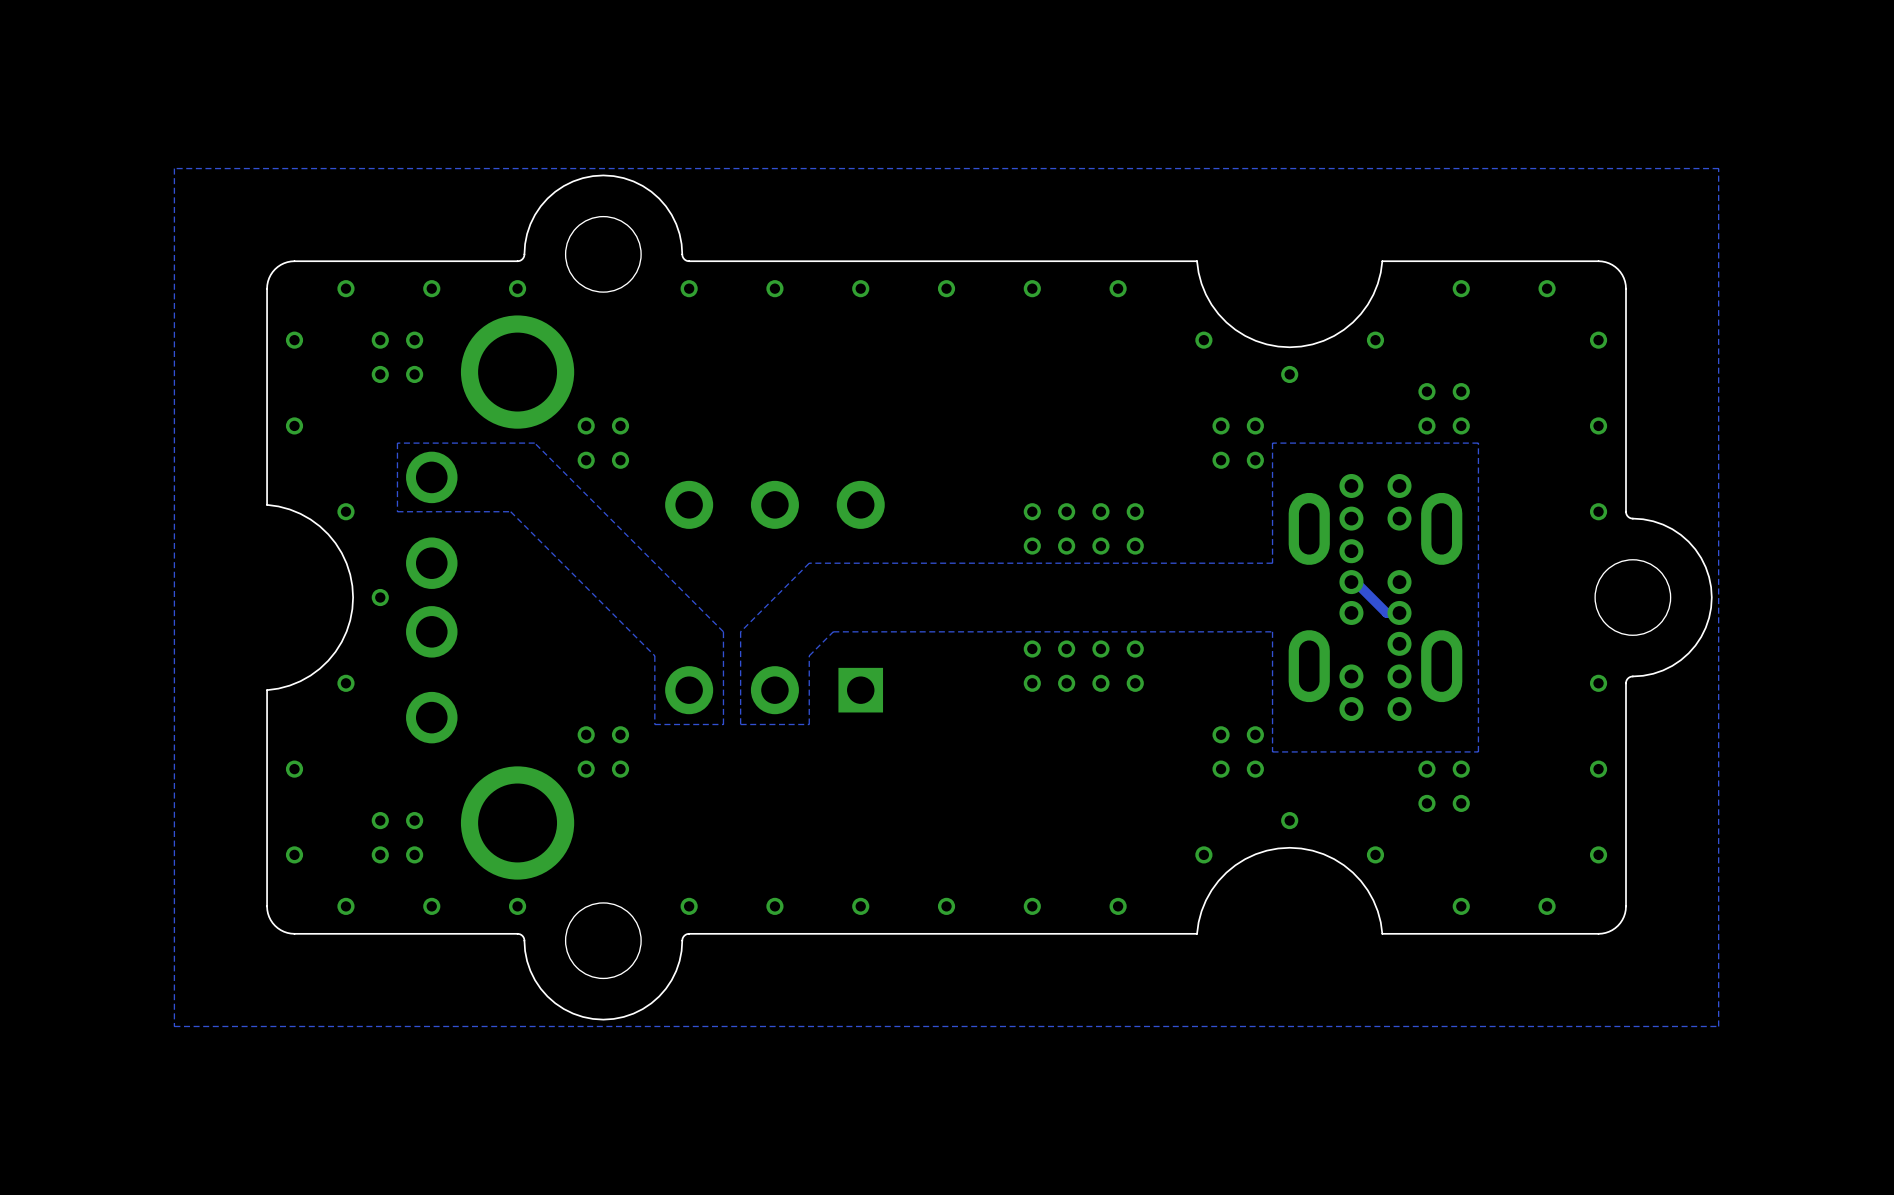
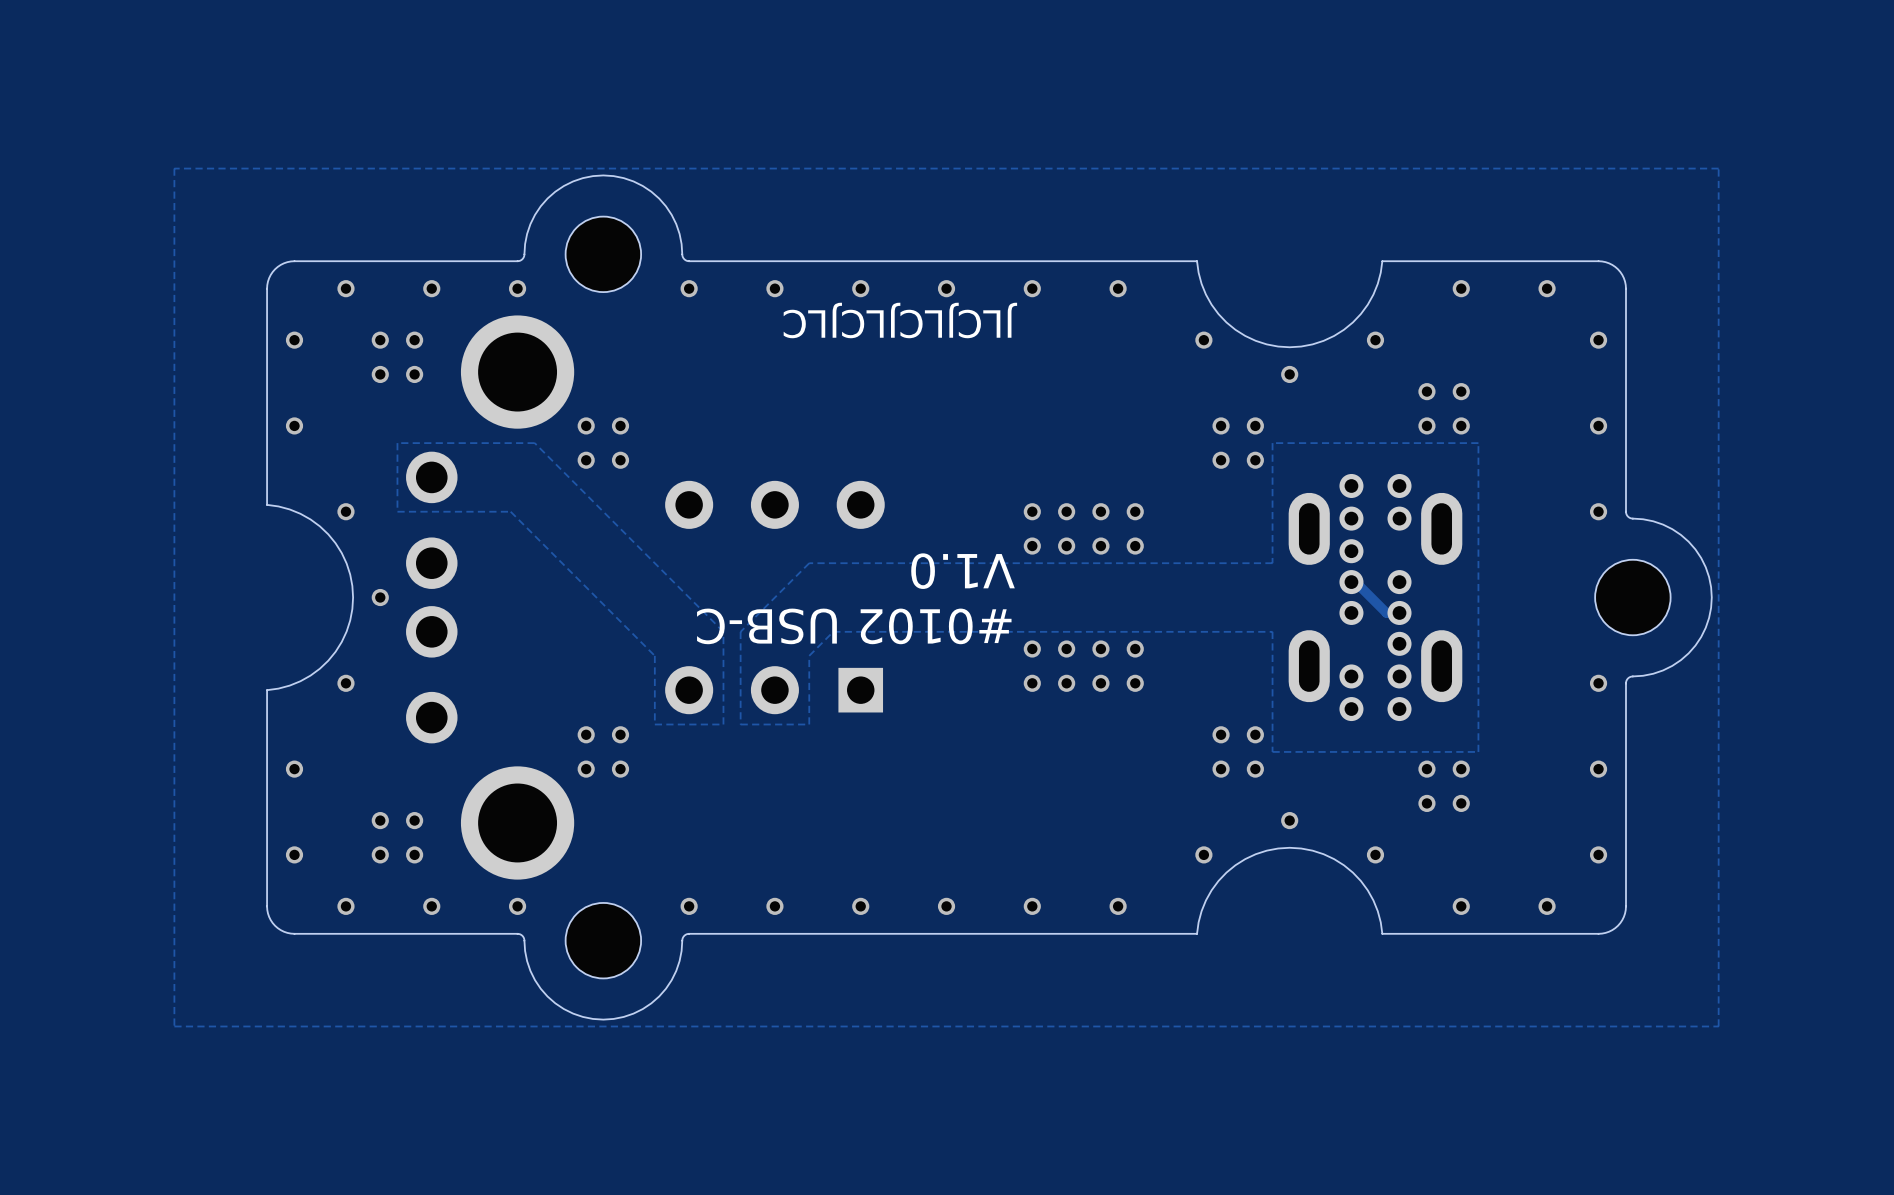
text: none -> JLCJLCJLCJLC (900, 320)
text: none -> V1.0 (963, 571)
text: none -> #0102 USB-C (854, 626)

